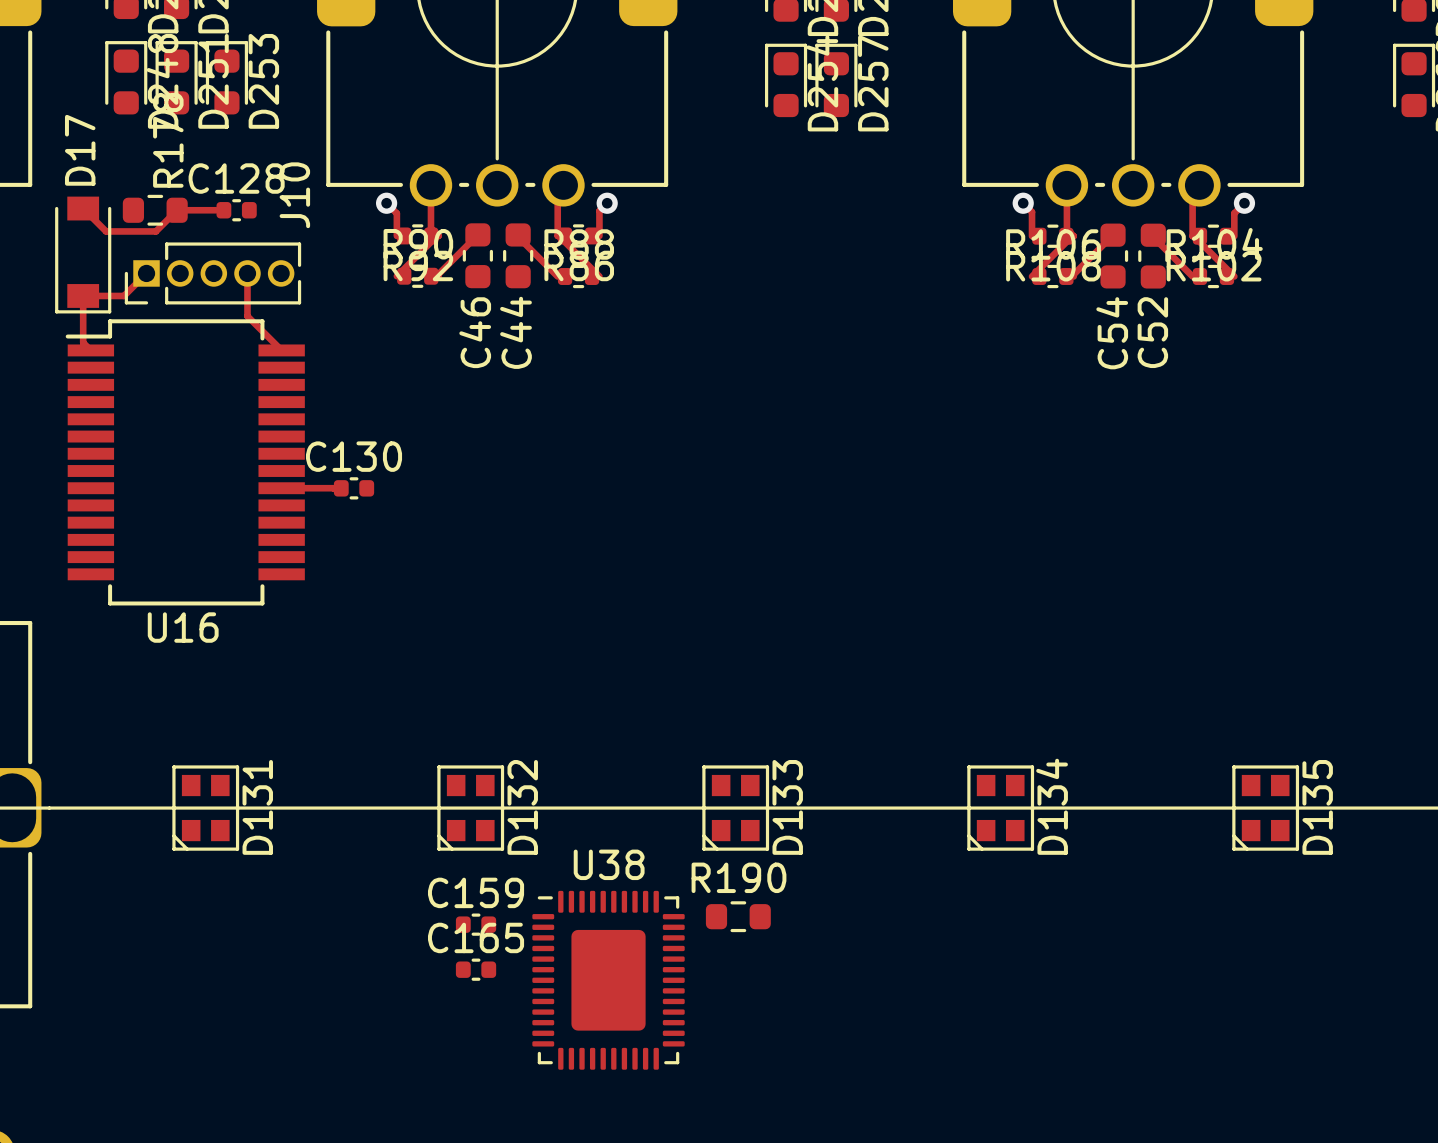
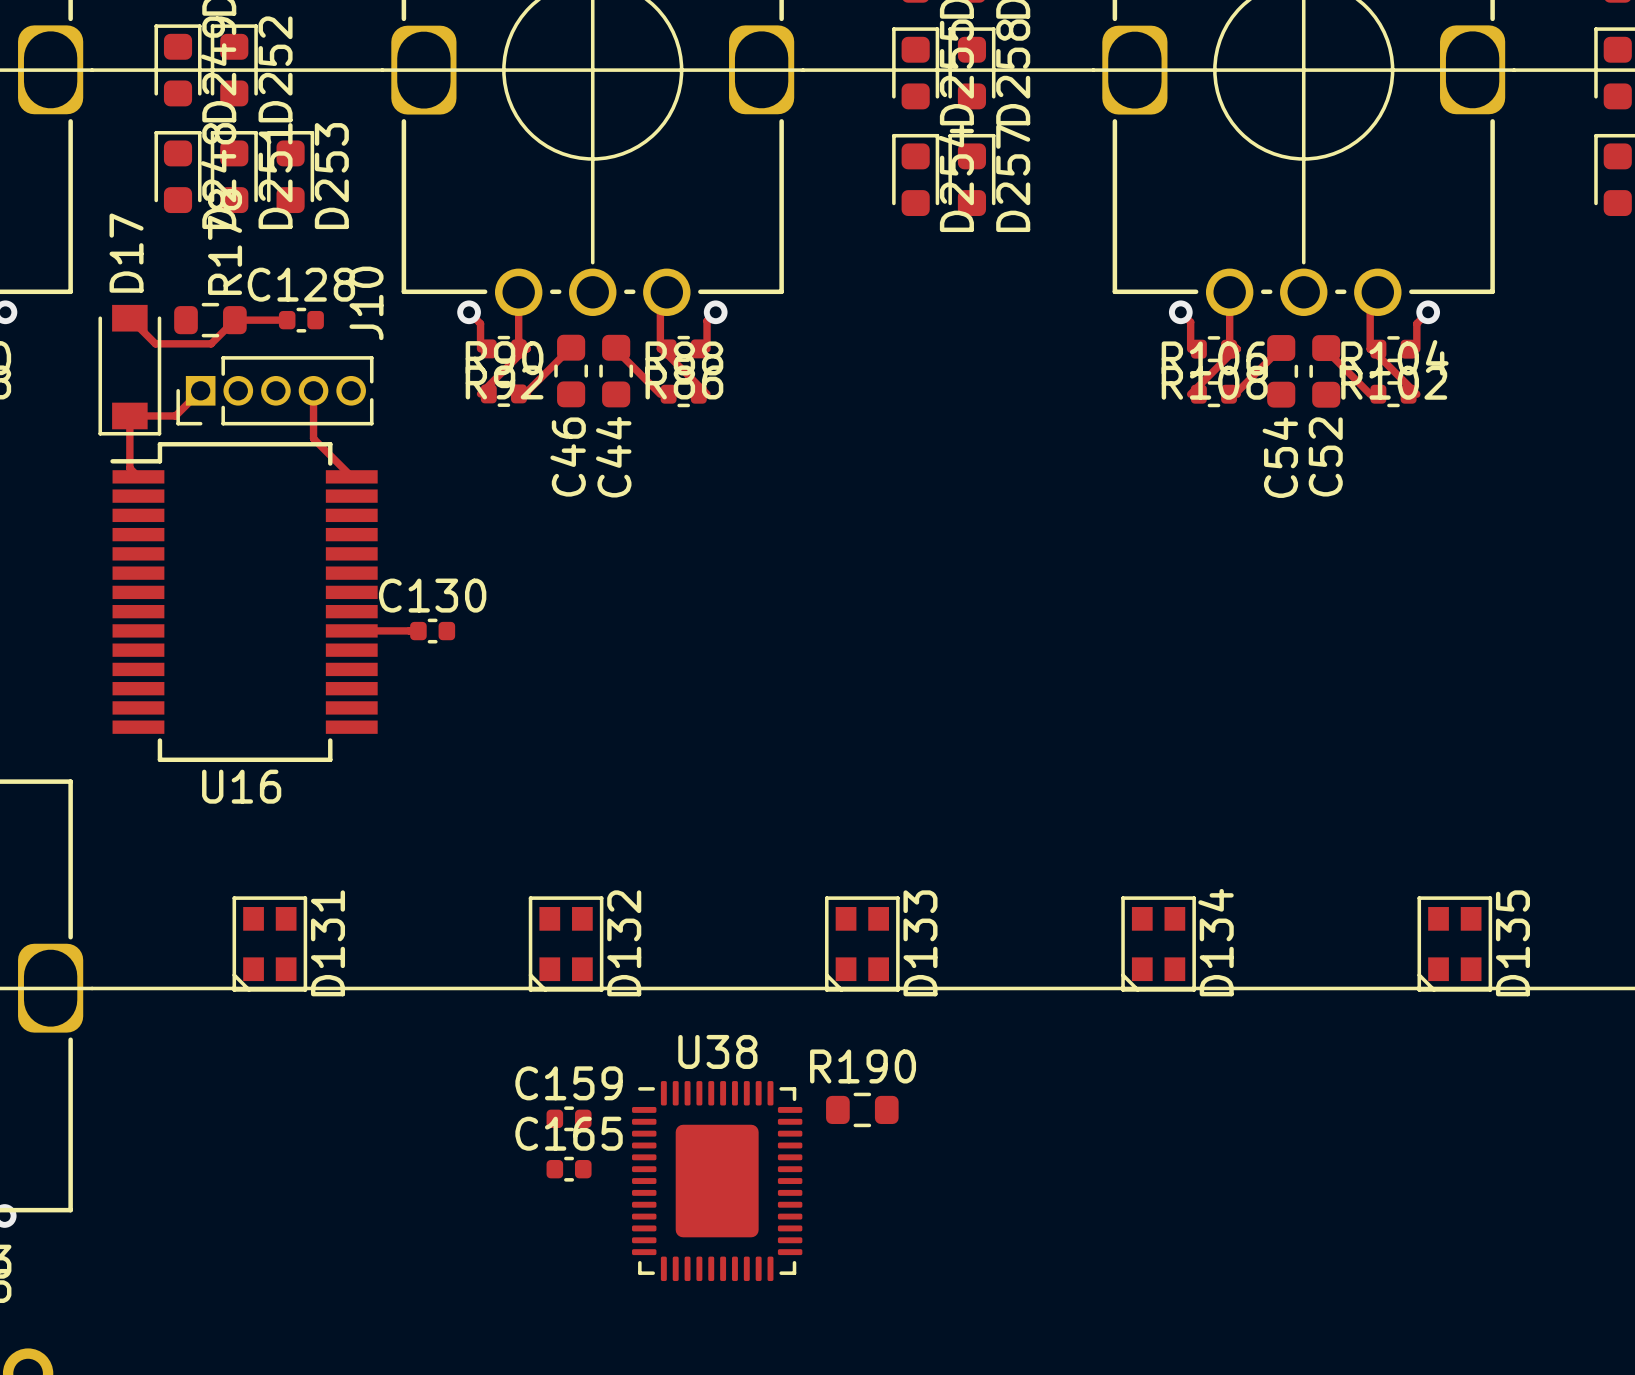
D131 position: (205, 808) -> (269, 944)
D132 position: (470, 808) -> (566, 944)
D133 position: (735, 808) -> (862, 944)
D134 position: (1000, 808) -> (1158, 944)
D135 position: (1265, 808) -> (1454, 944)

